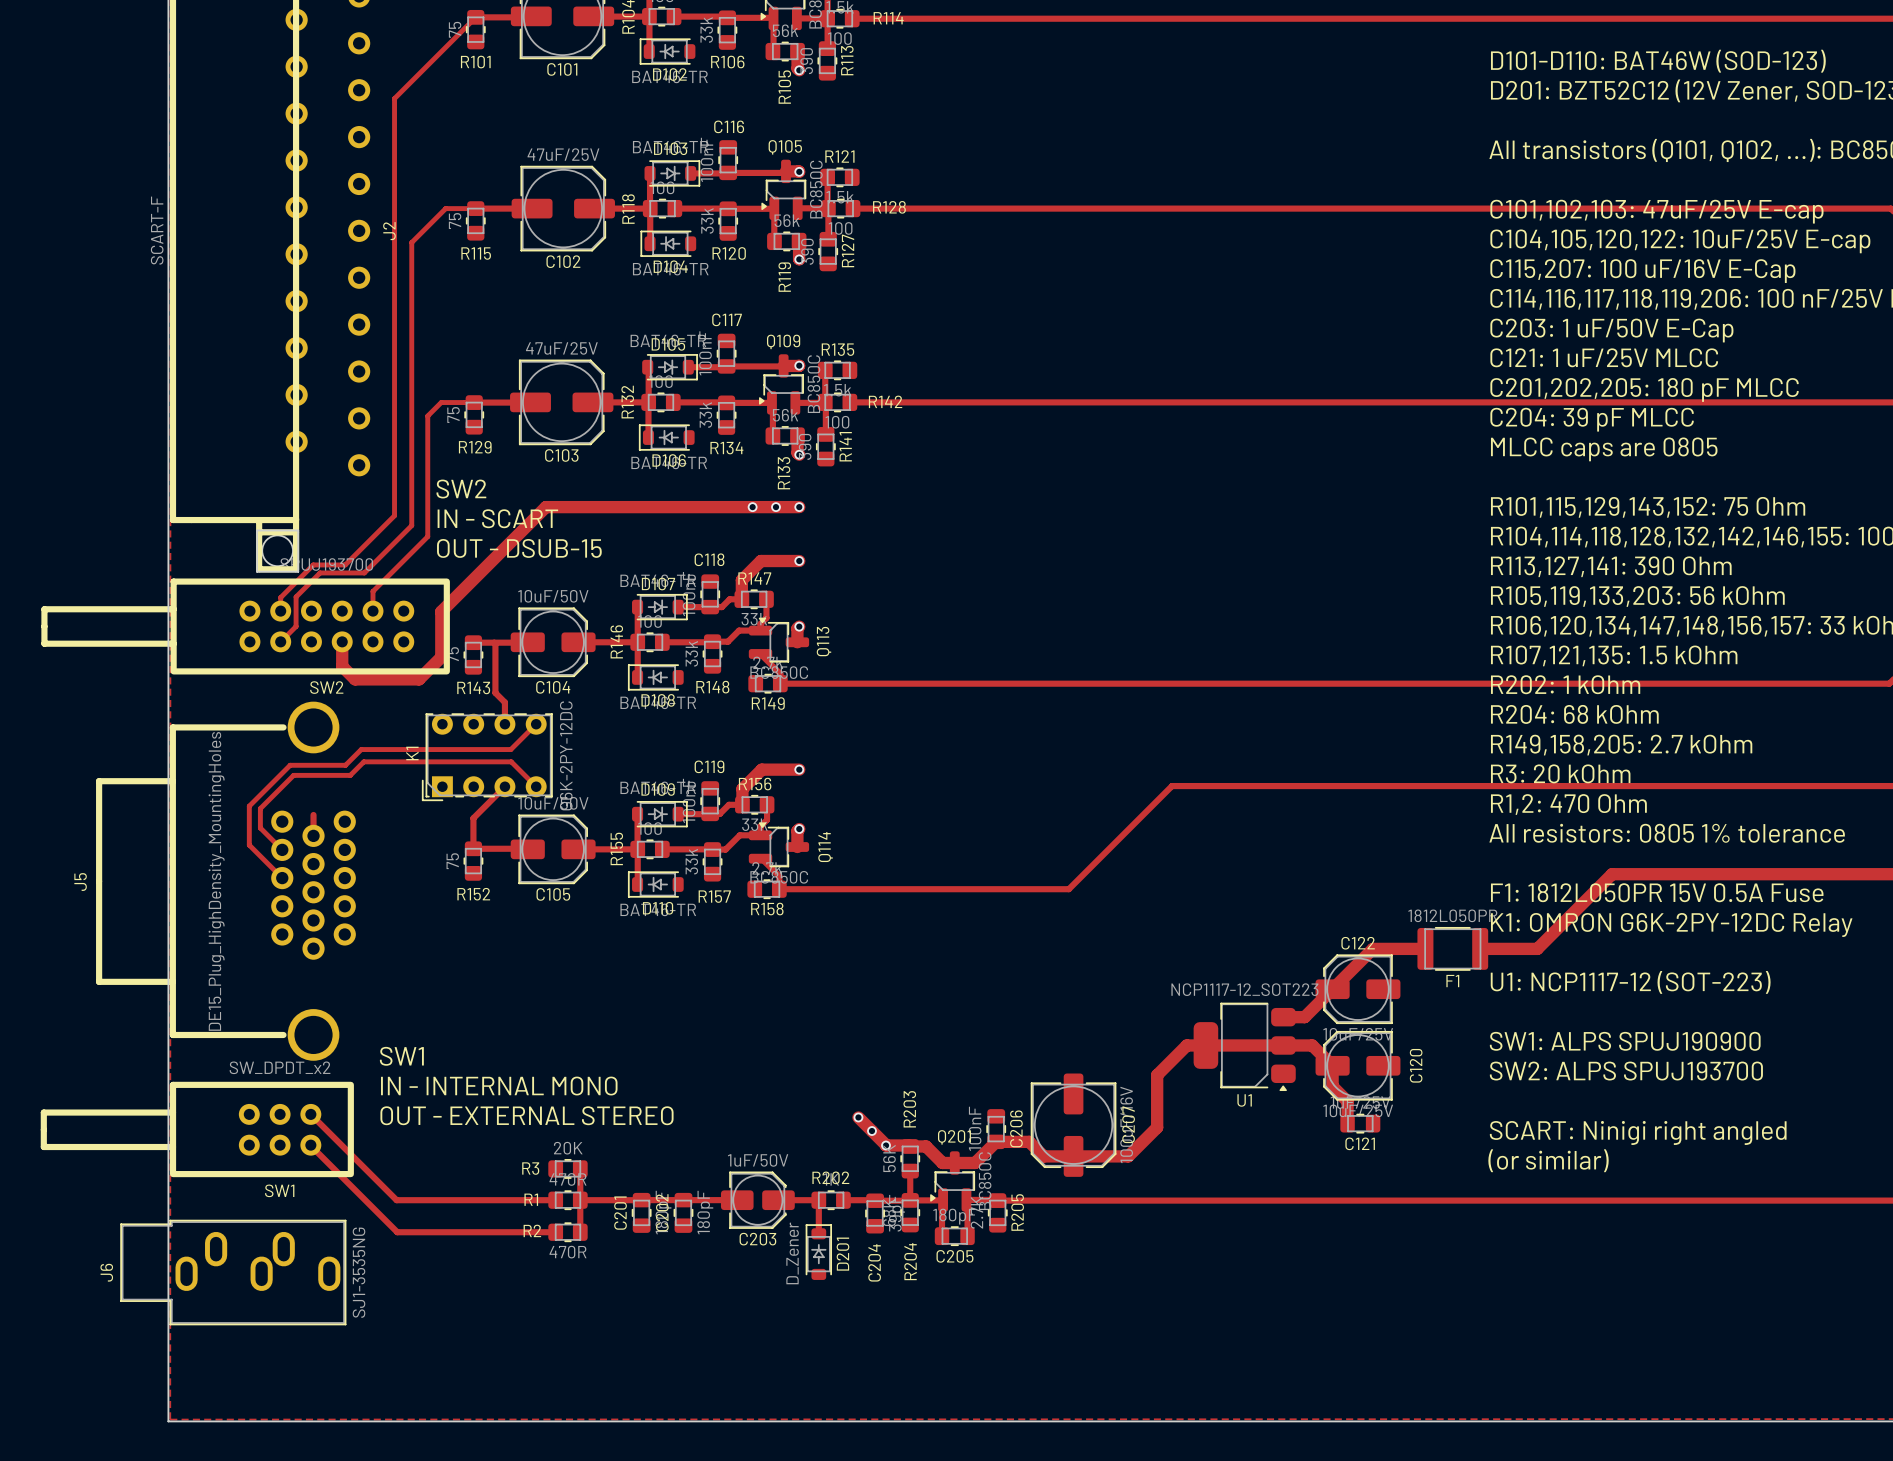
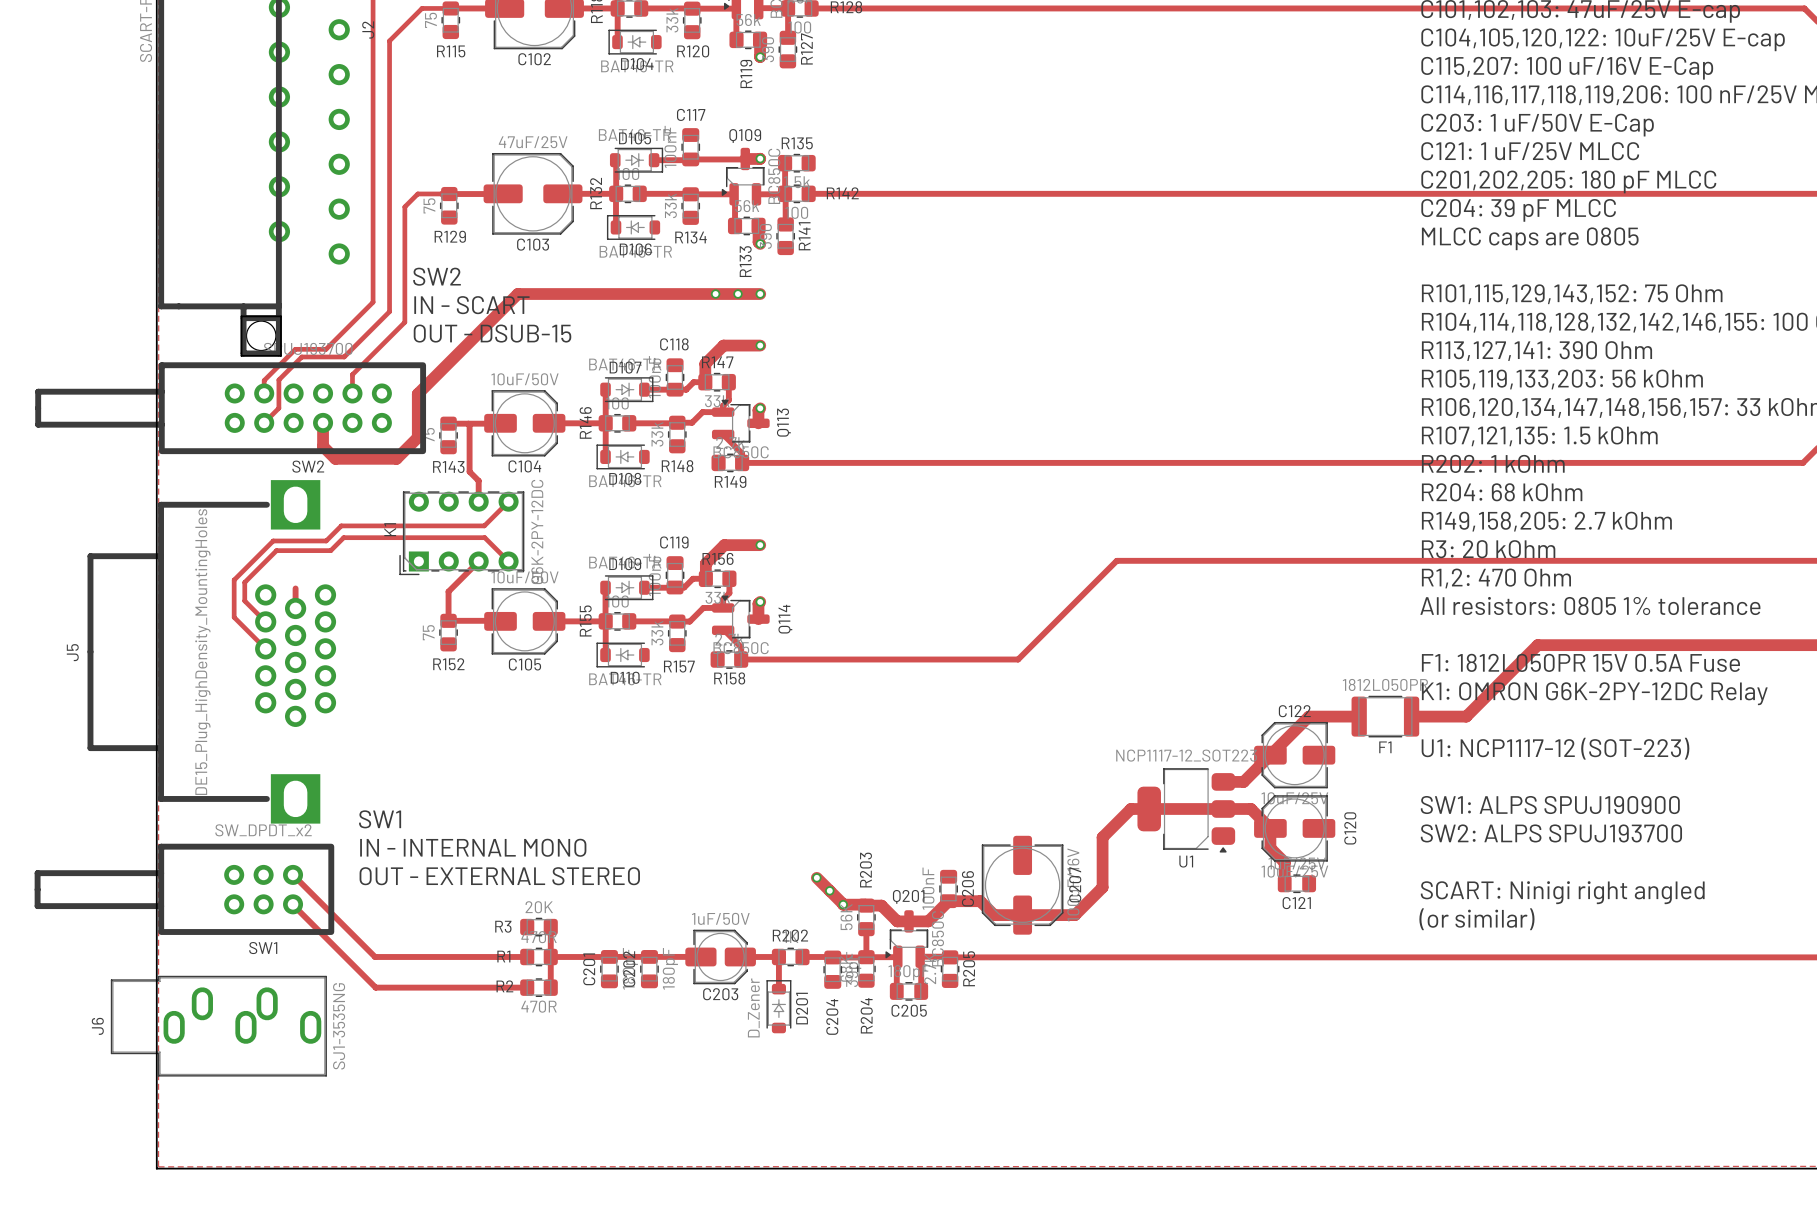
J5 footprint: [96, 701, 356, 1061] -> [87, 480, 337, 824]

